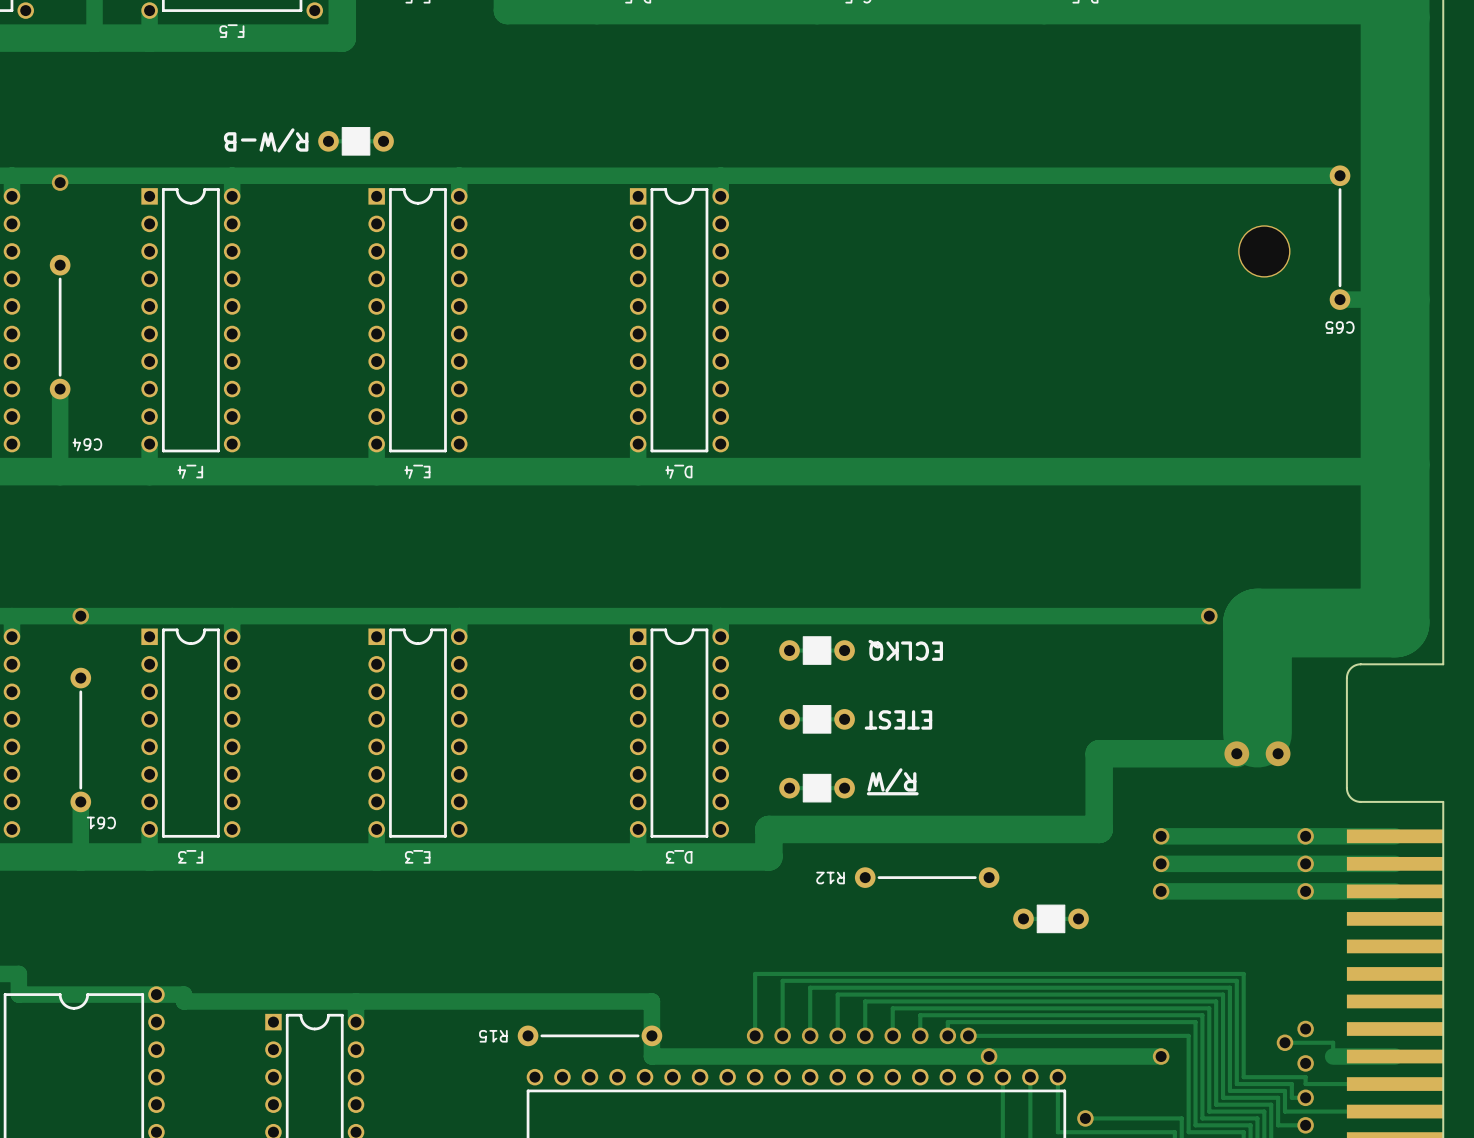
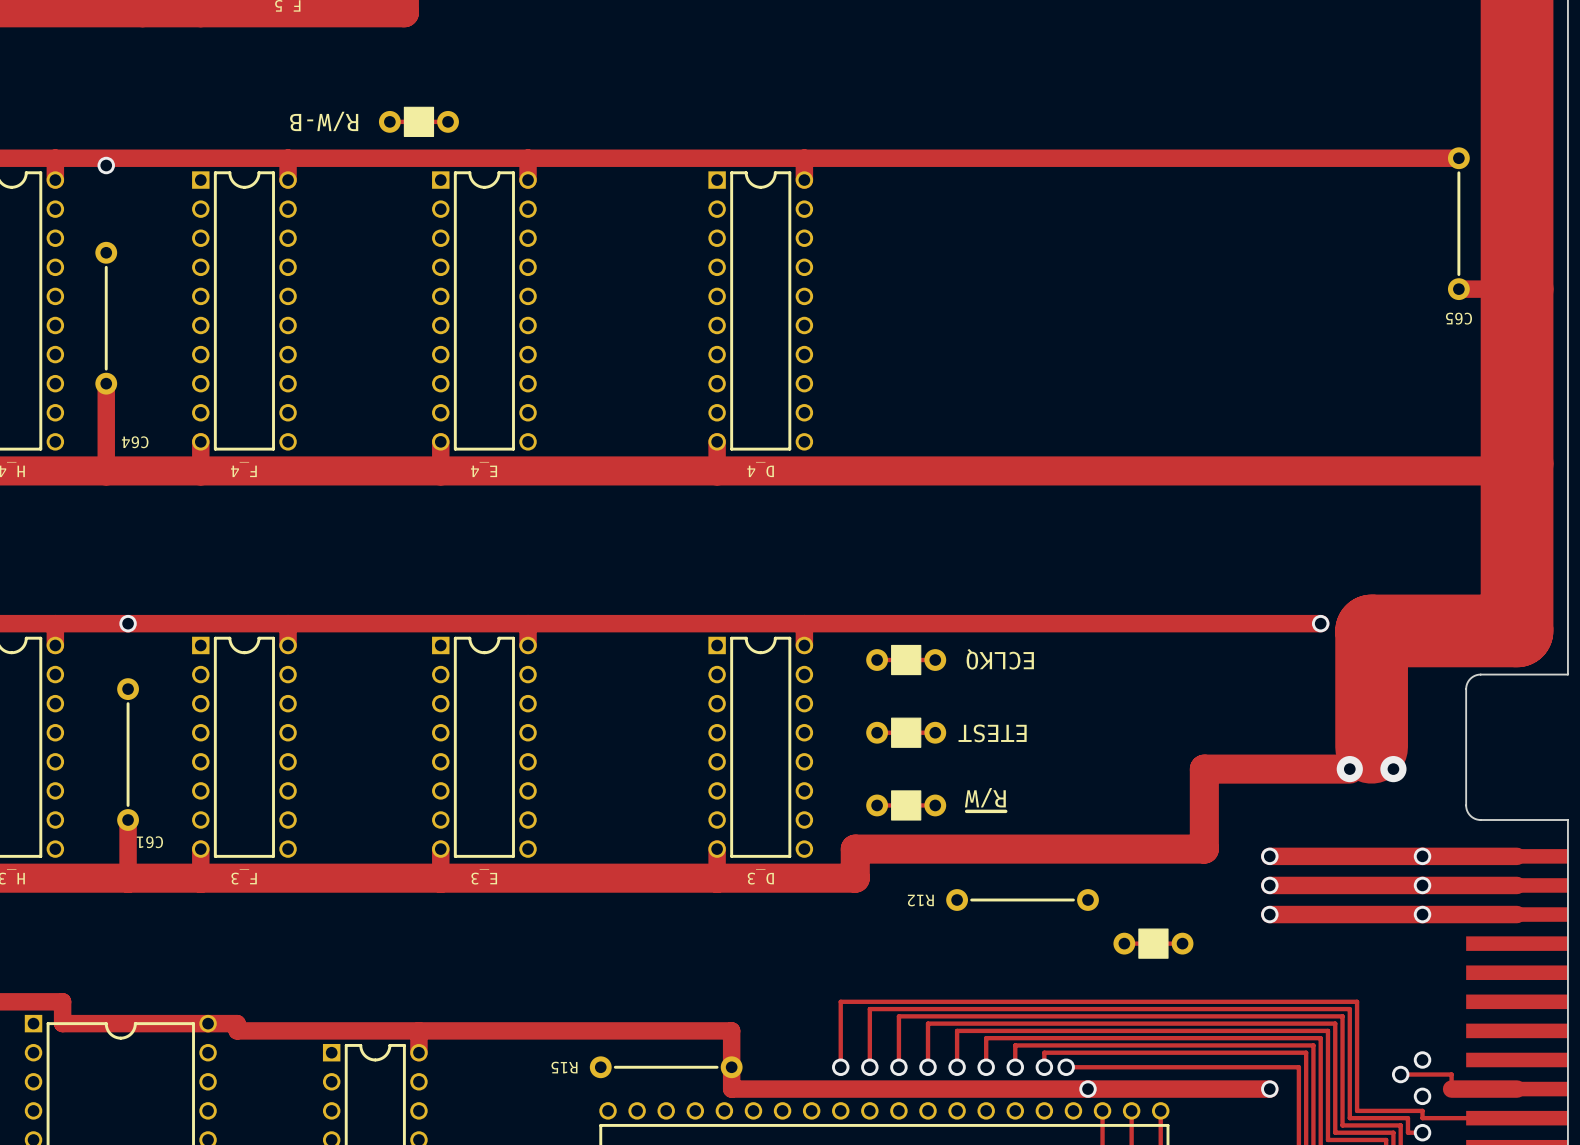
part: (1264, 251) -> none

